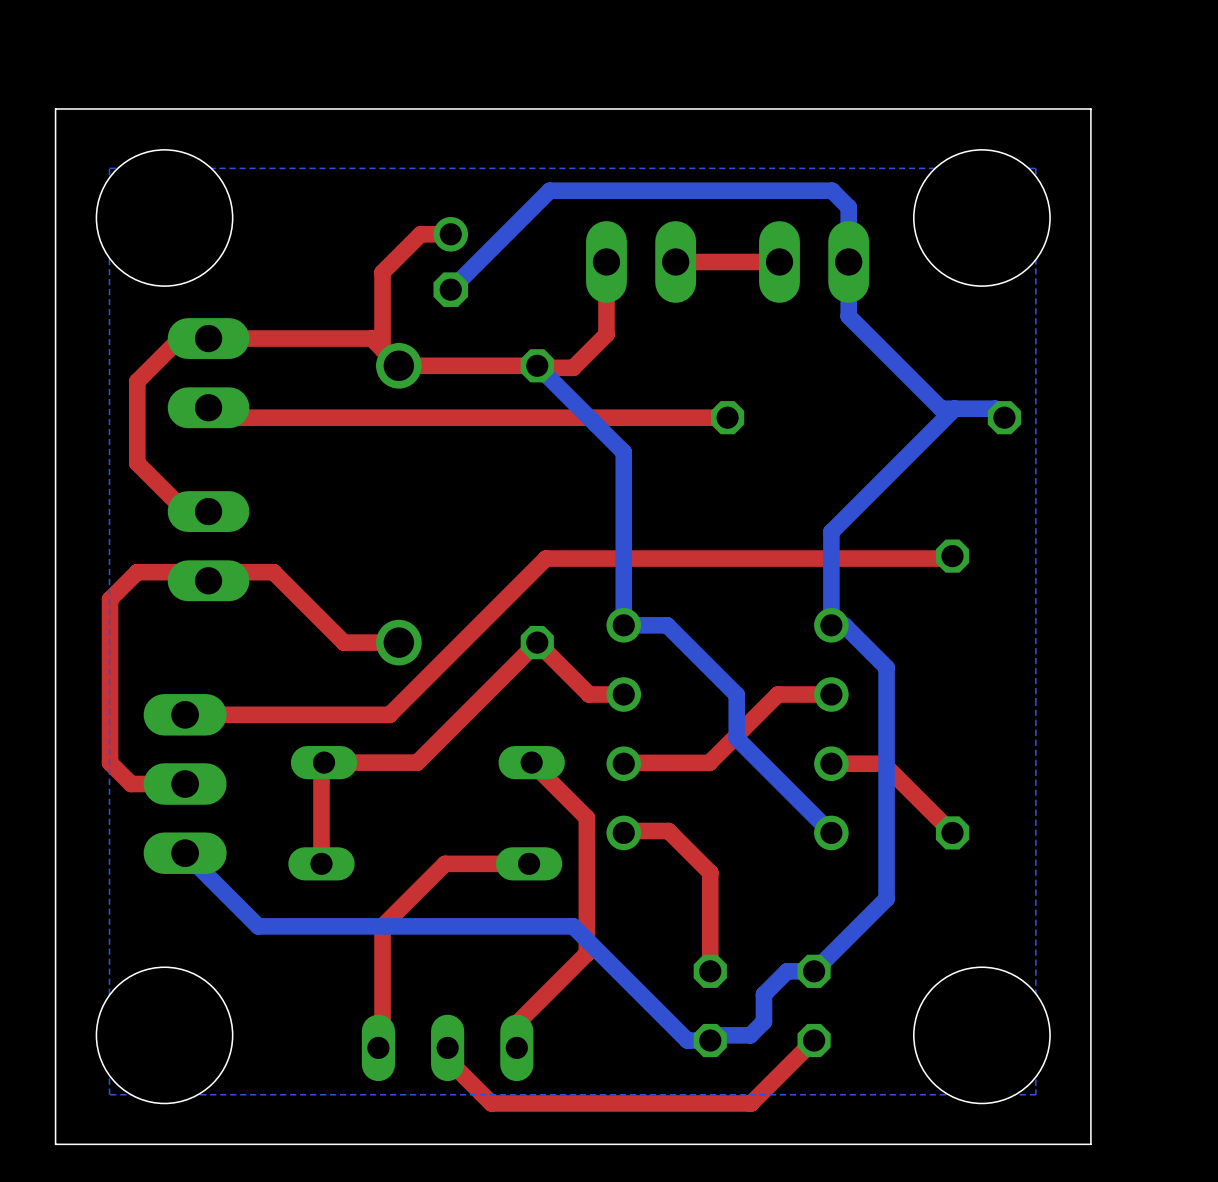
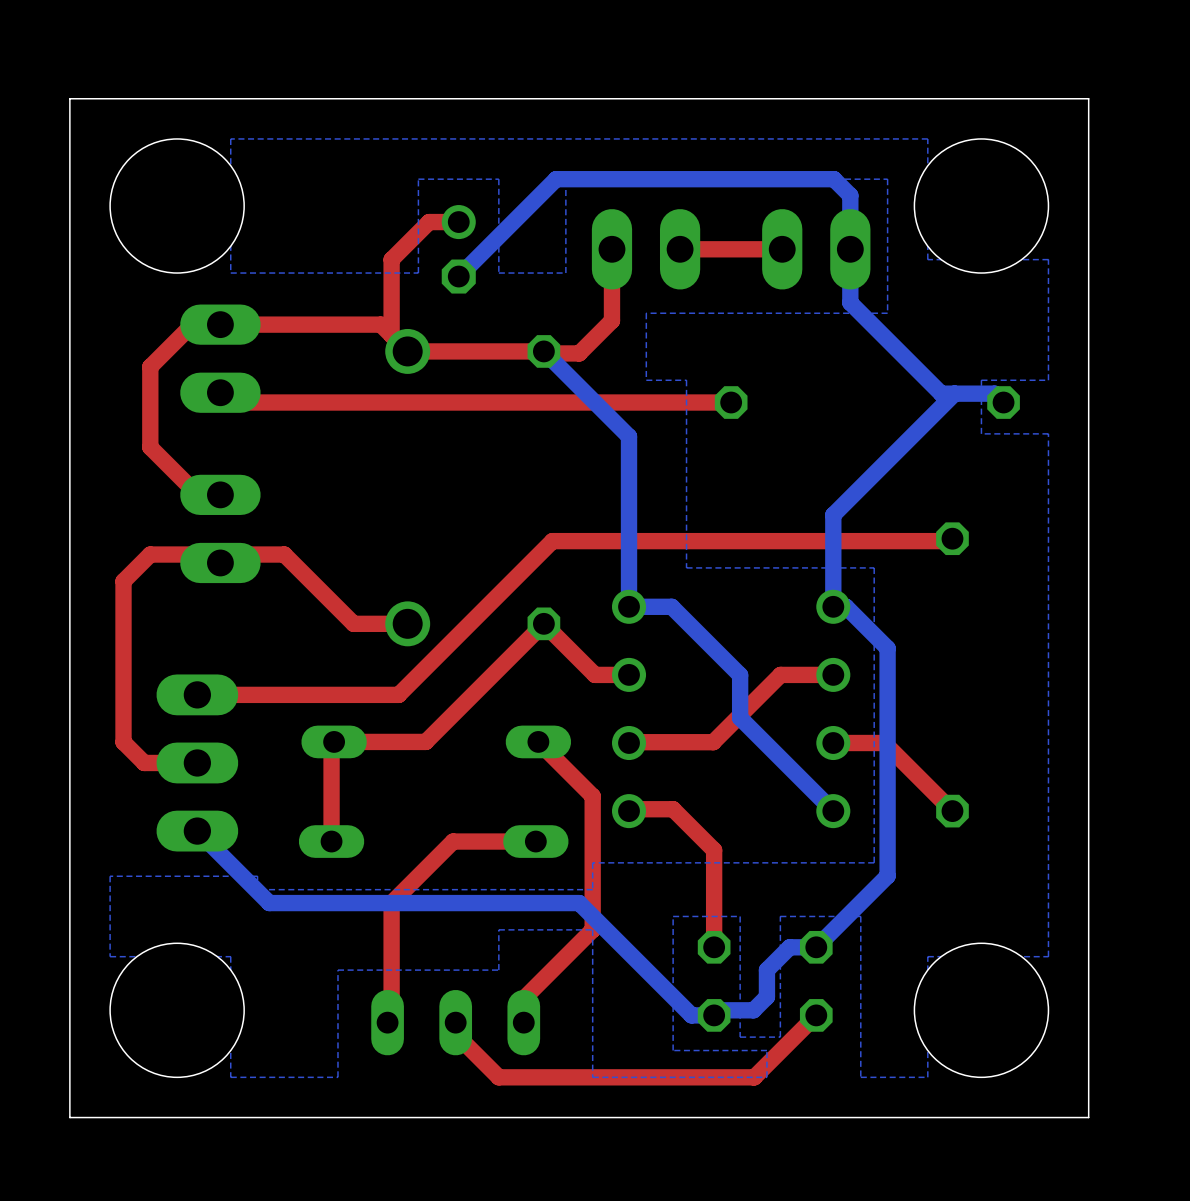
bottom zone outline: (1035, 168) (109, 168) (109, 1094) (1035, 1094) (1035, 168) -> (927, 138) (927, 259) (1048, 259) (1048, 380) (981, 380) (981, 433) (1048, 433) (1048, 956) (927, 956) (927, 1077) (860, 1077) (860, 916) (780, 916) (780, 1037) (740, 1037) (740, 916) (673, 916) (673, 1050) (766, 1050) (766, 1077) (592, 1077) (592, 929) (498, 929) (498, 970) (337, 970) (337, 1077) (230, 1077) (230, 956) (110, 956) (110, 876) (257, 876) (257, 889) (592, 889) (592, 862) (874, 862) (874, 567) (686, 567) (686, 380) (646, 380) (646, 313) (887, 313) (887, 179) (565, 179) (565, 273) (498, 273) (498, 179) (418, 179) (418, 273) (230, 273) (230, 138) (927, 138)

